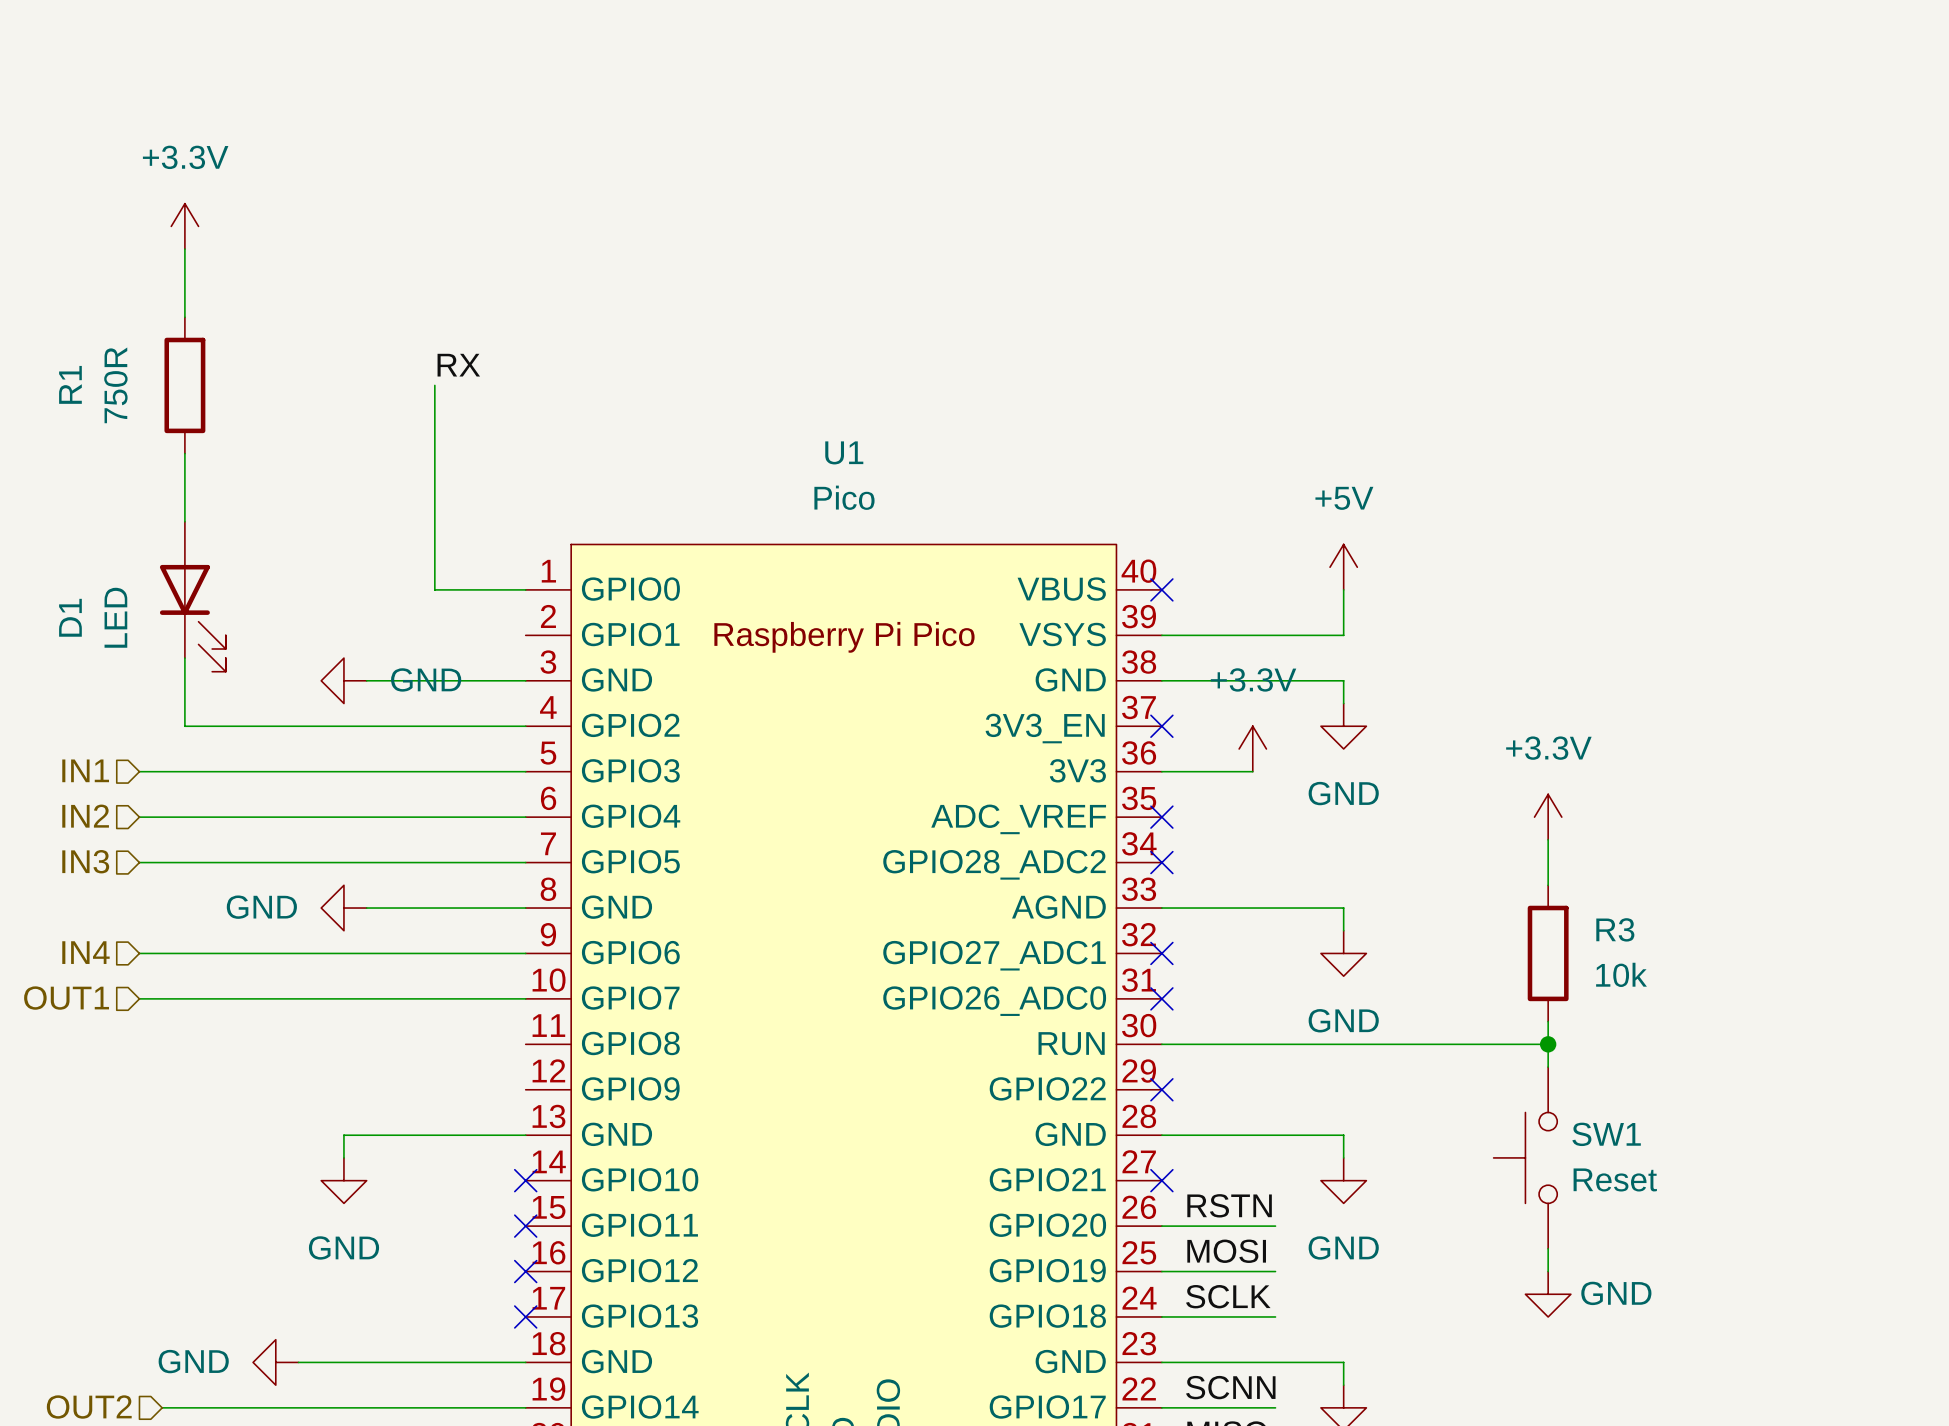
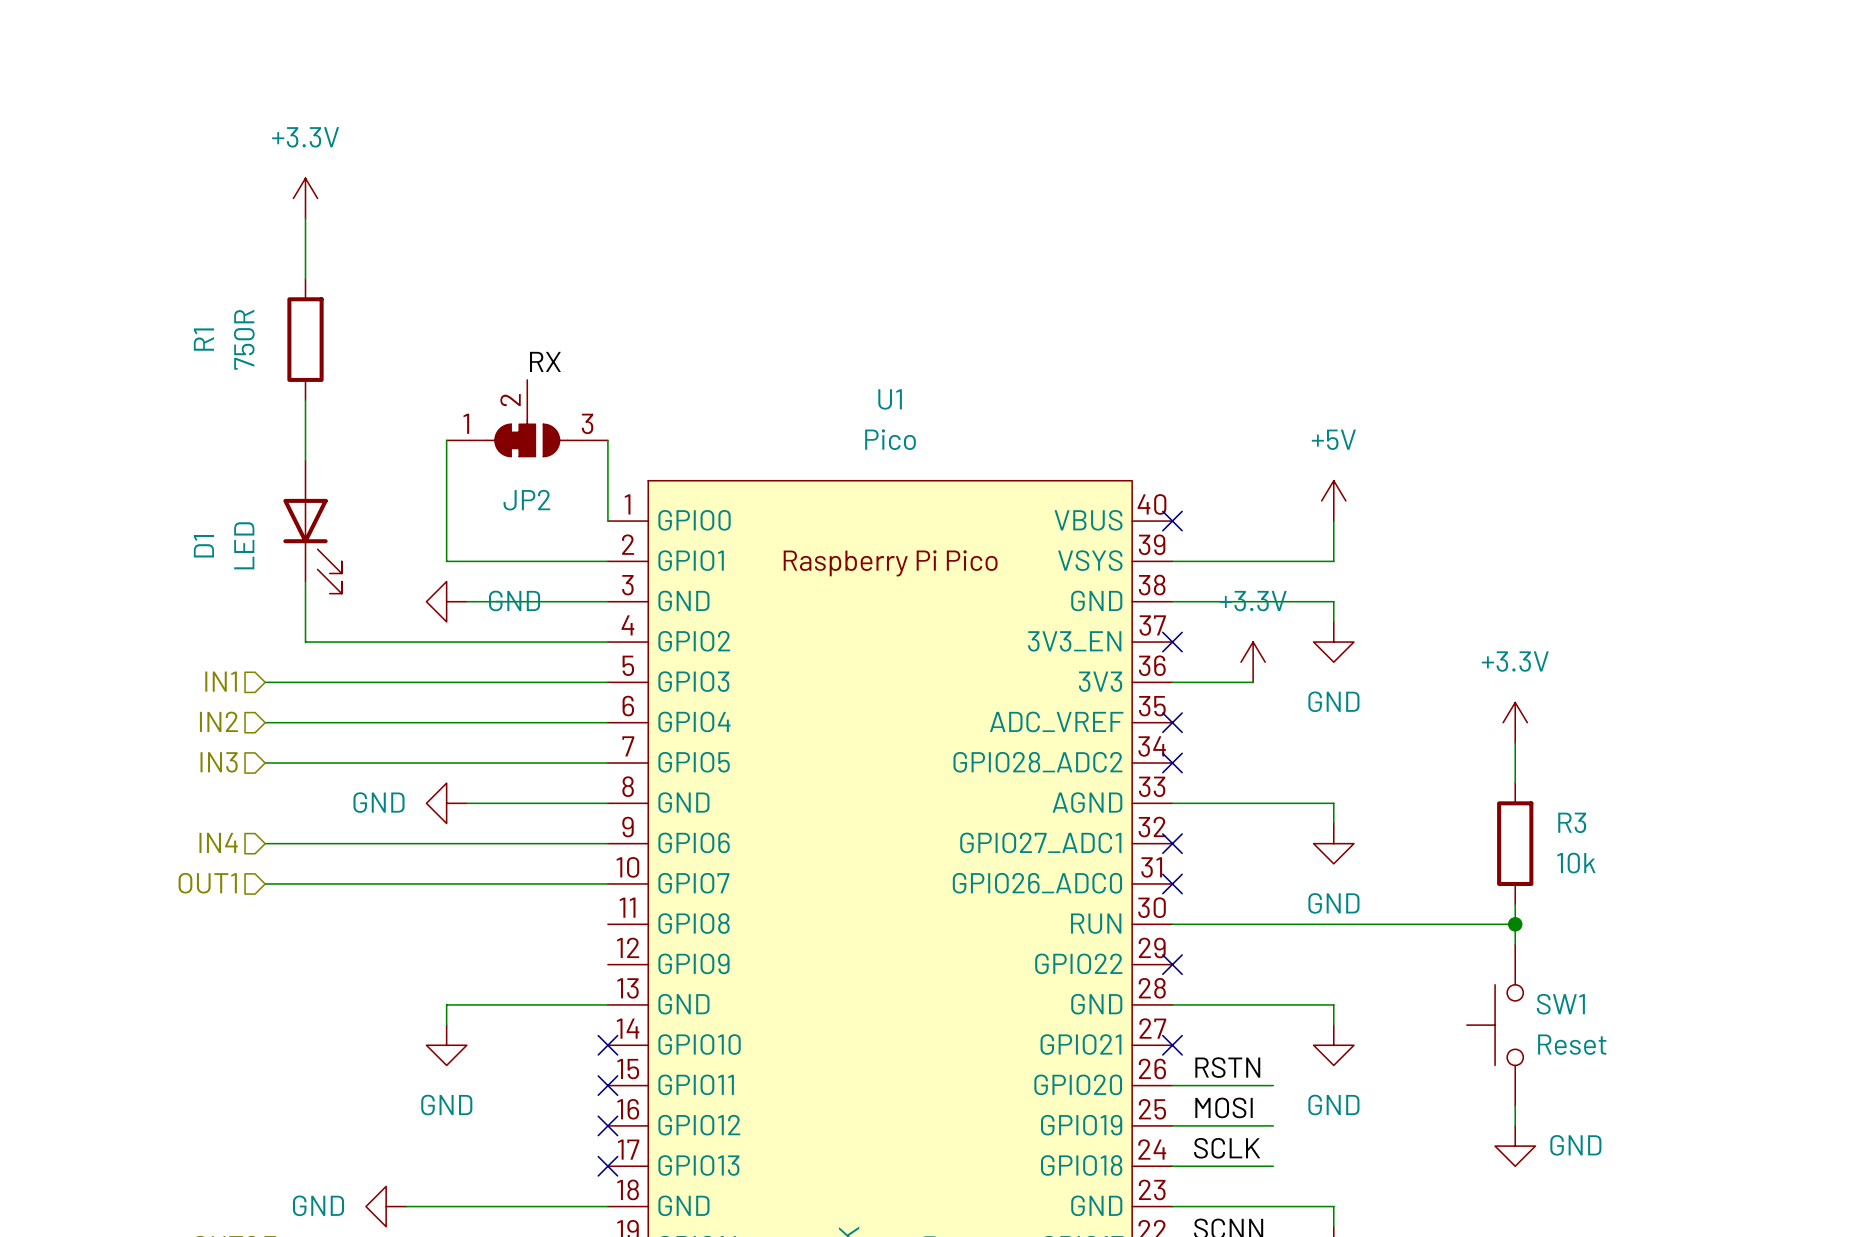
label position: RX (458, 365) -> RX (545, 361)
wire: (434, 385) (434, 589) (525, 589) -> (607, 440) (607, 521)
JP2: none -> (527, 418)
wire: none -> (446, 440) (446, 561) (607, 561)

